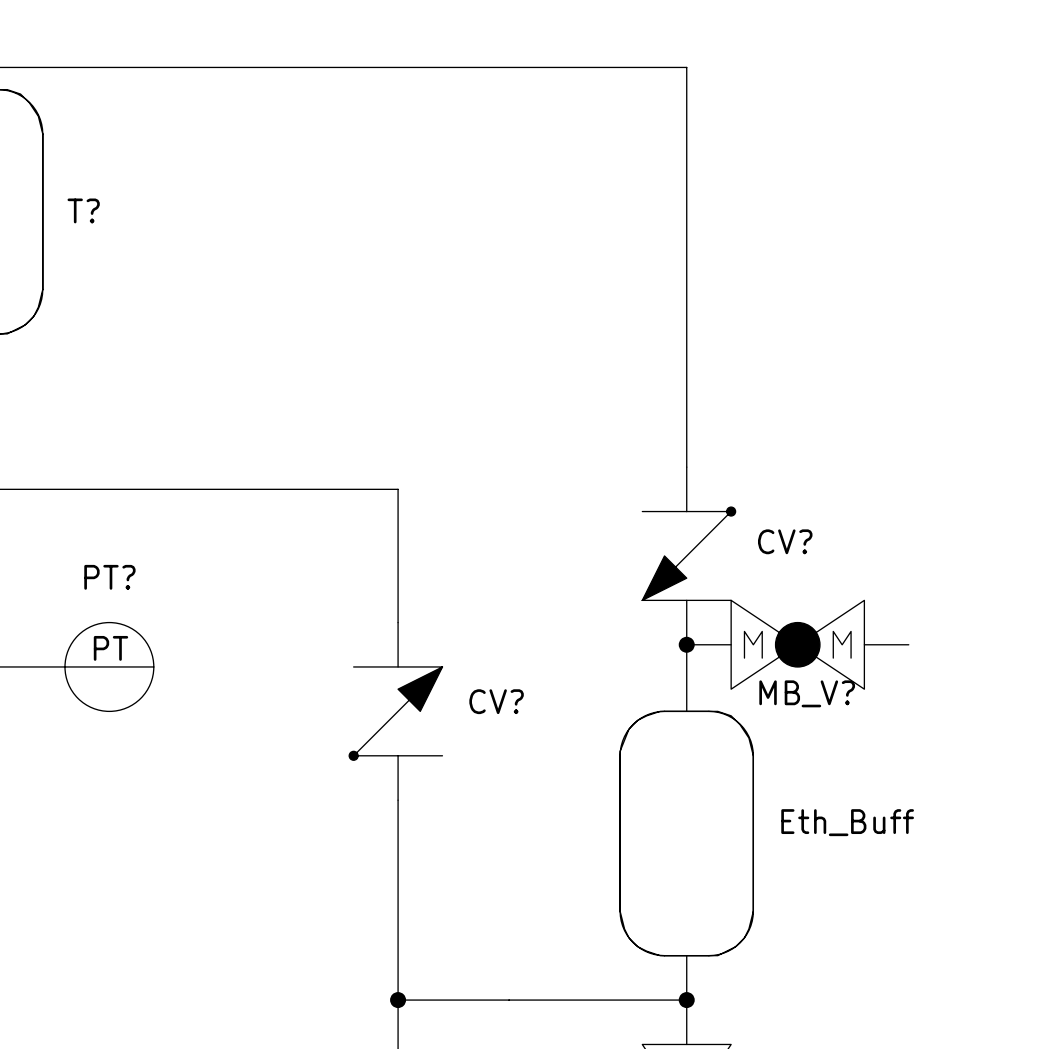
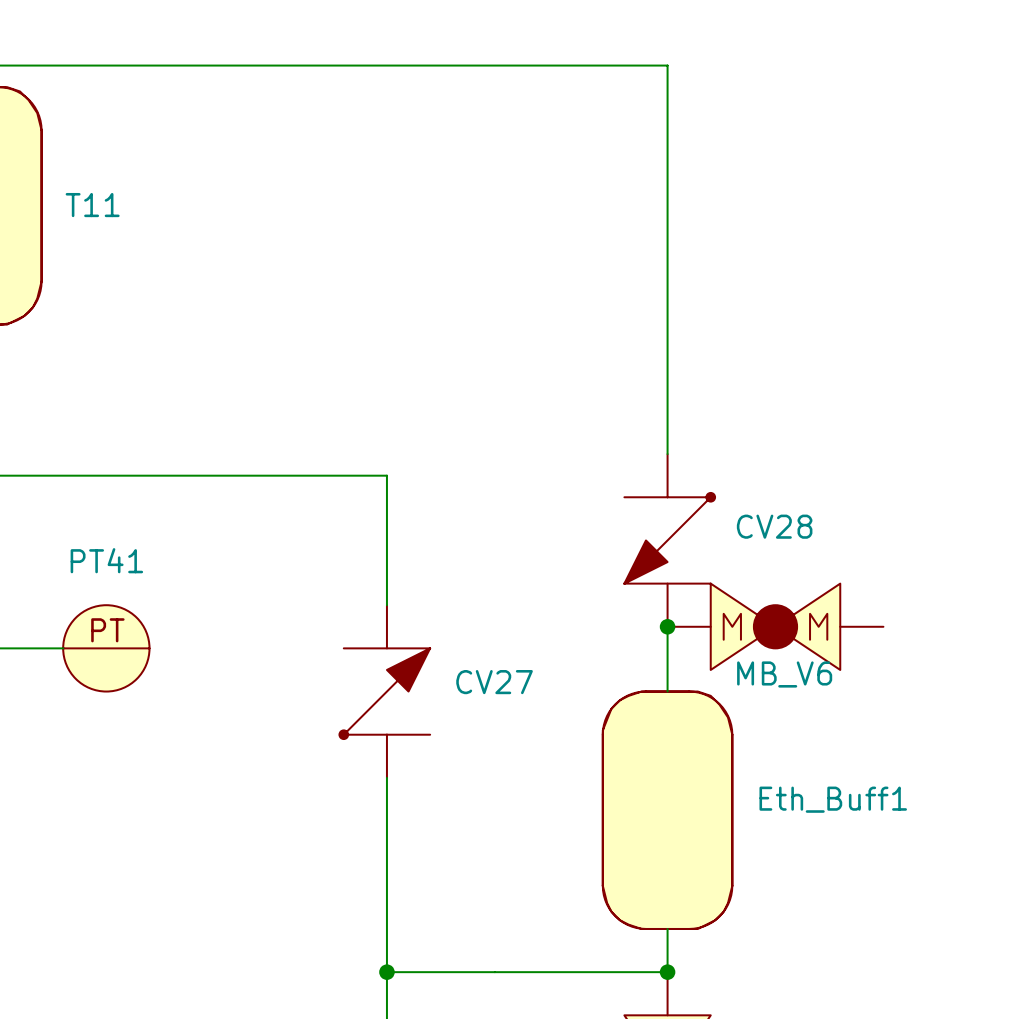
T? name: T? (83, 210) -> T11 (92, 205)
CV? name: CV? (785, 541) -> CV28 (774, 526)
PT? name: PT? (109, 577) -> PT41 (106, 560)
MB_V? name: MB_V? (807, 693) -> MB_V6 (784, 674)
CV? name: CV? (496, 701) -> CV27 (494, 682)
Eth_Buff name: Eth_Buff (847, 822) -> Eth_Buff1 (833, 799)

